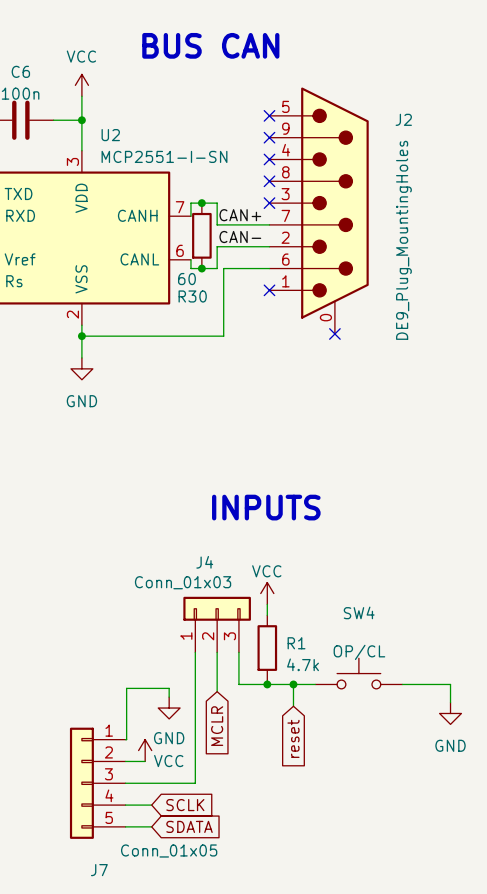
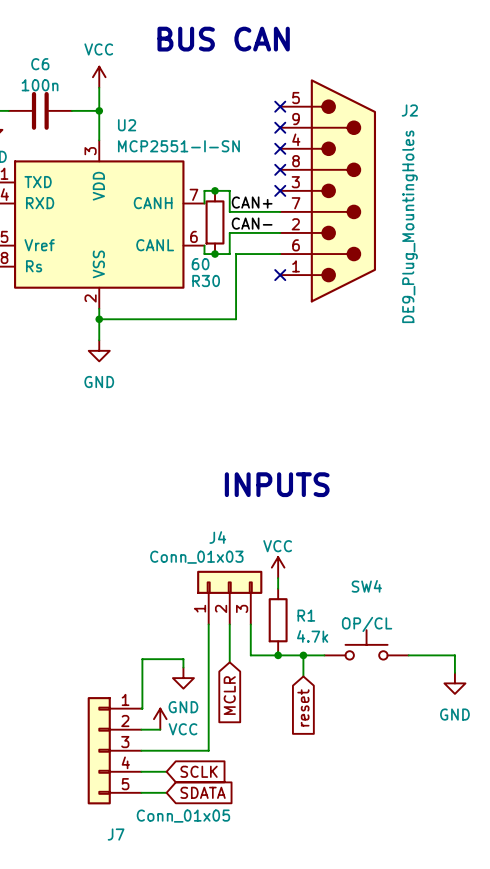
J2 symbol: [269, 87, 369, 334] -> [280, 79, 377, 303]
no-connect mark: (334, 333) -> none

